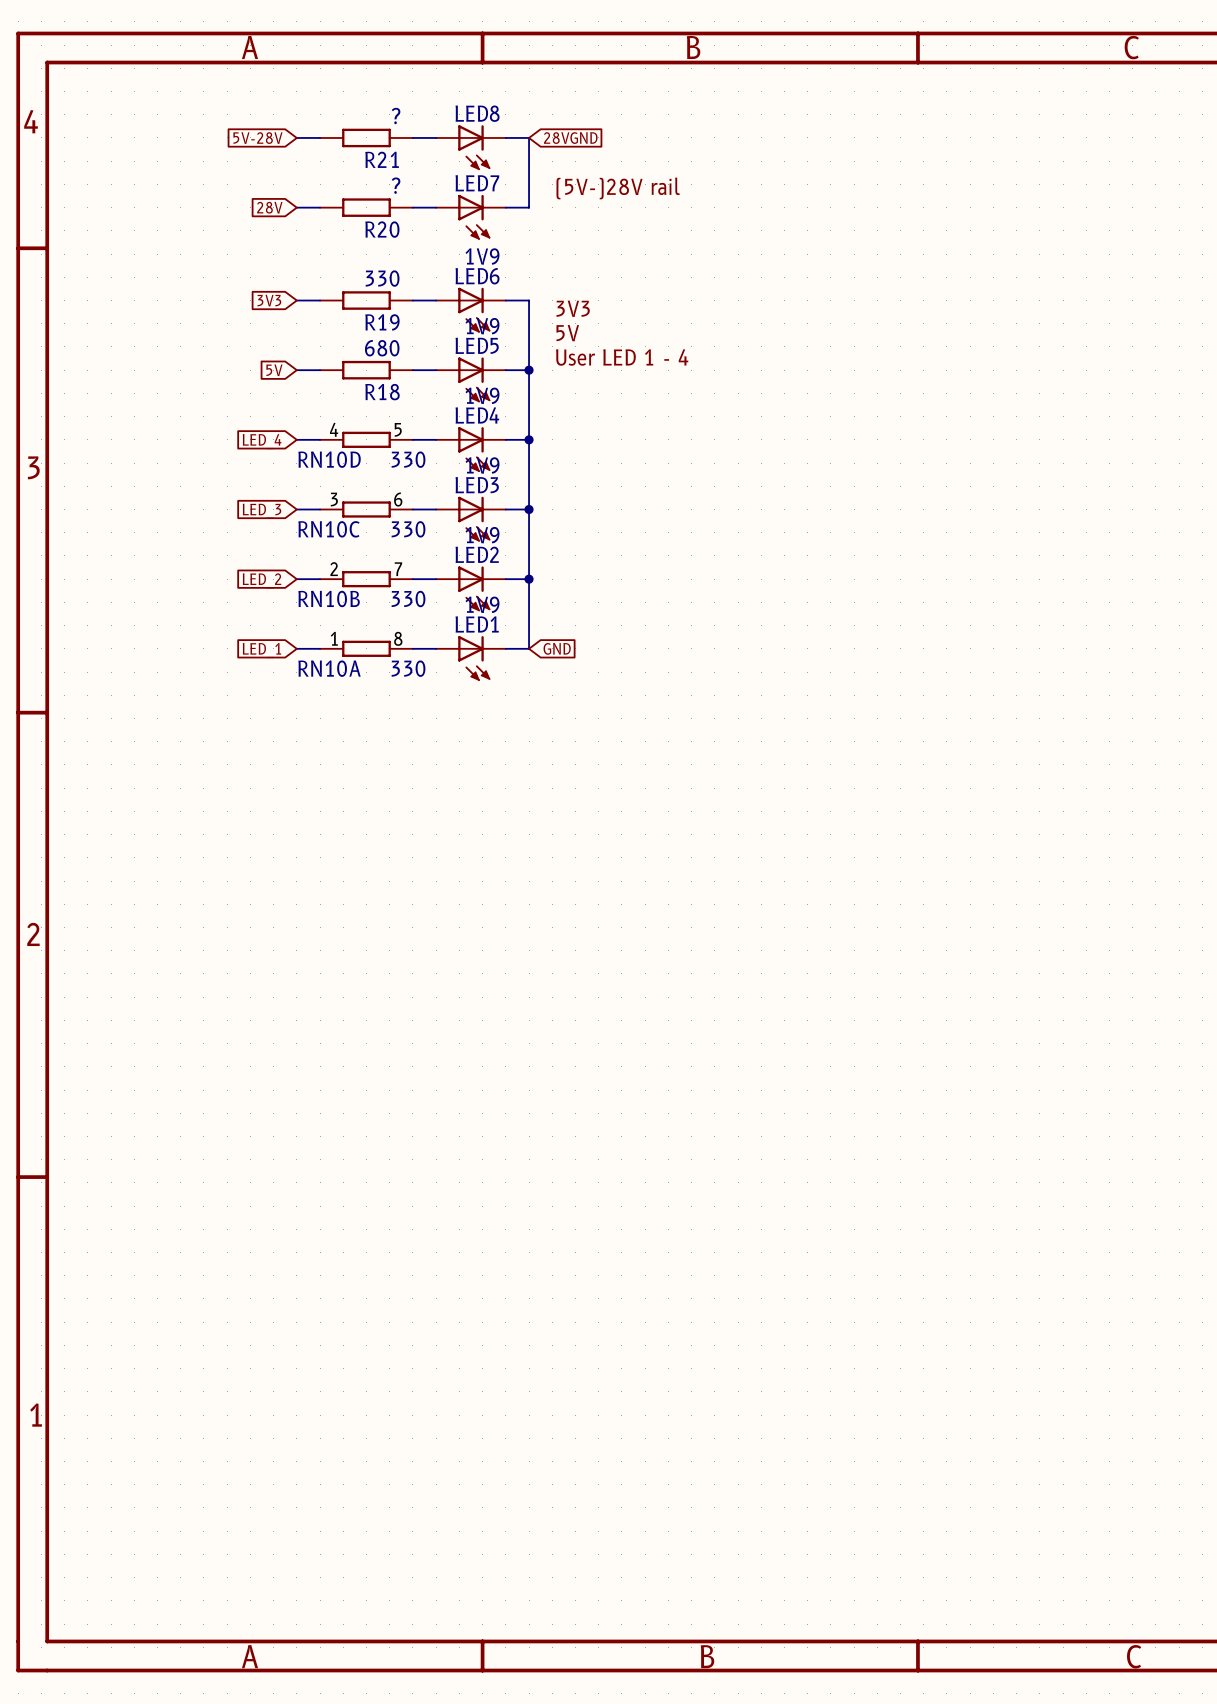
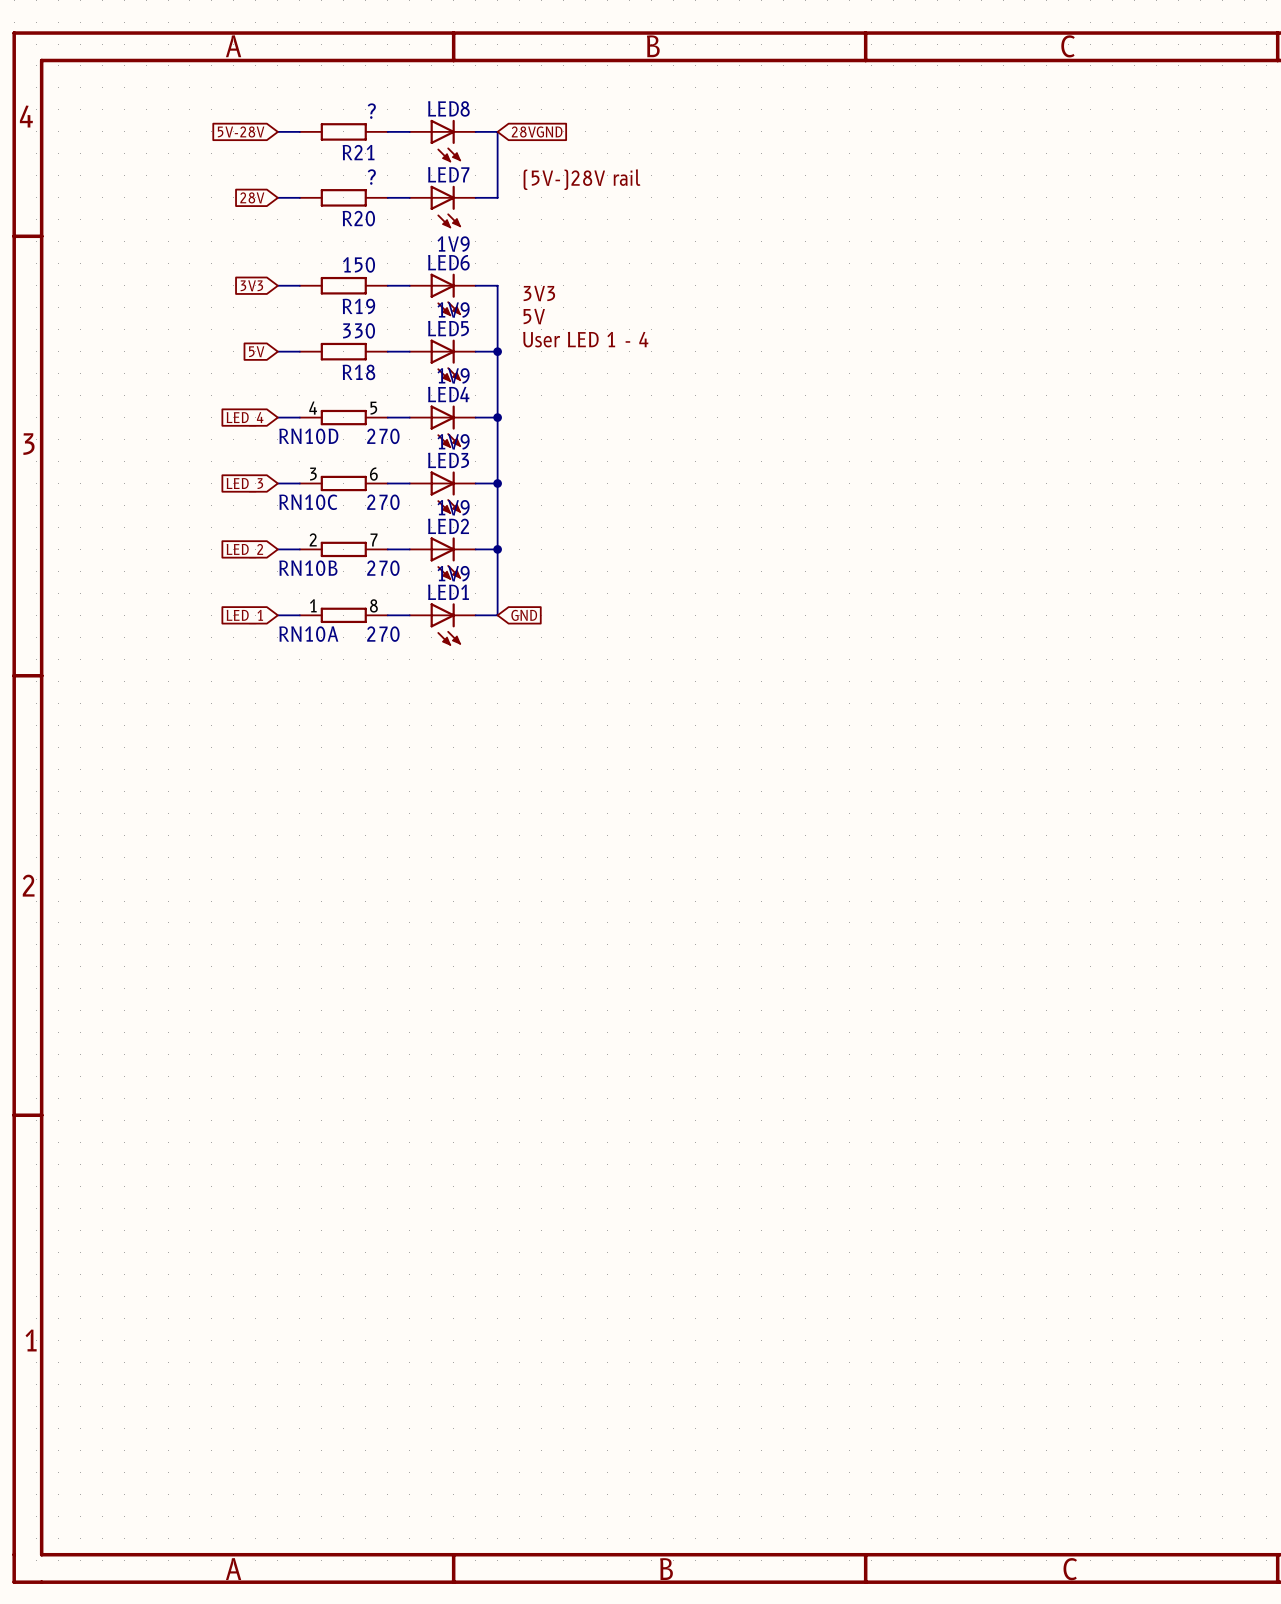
R19 value: 330 (382, 278) -> 150 (359, 264)
R18 value: 680 (382, 348) -> 330 (359, 330)
RN10D value: 330 (408, 459) -> 270 (383, 436)
RN10C value: 330 (408, 529) -> 270 (383, 502)
RN10B value: 330 (408, 599) -> 270 (383, 568)
RN10A value: 330 (408, 668) -> 270 (383, 634)

